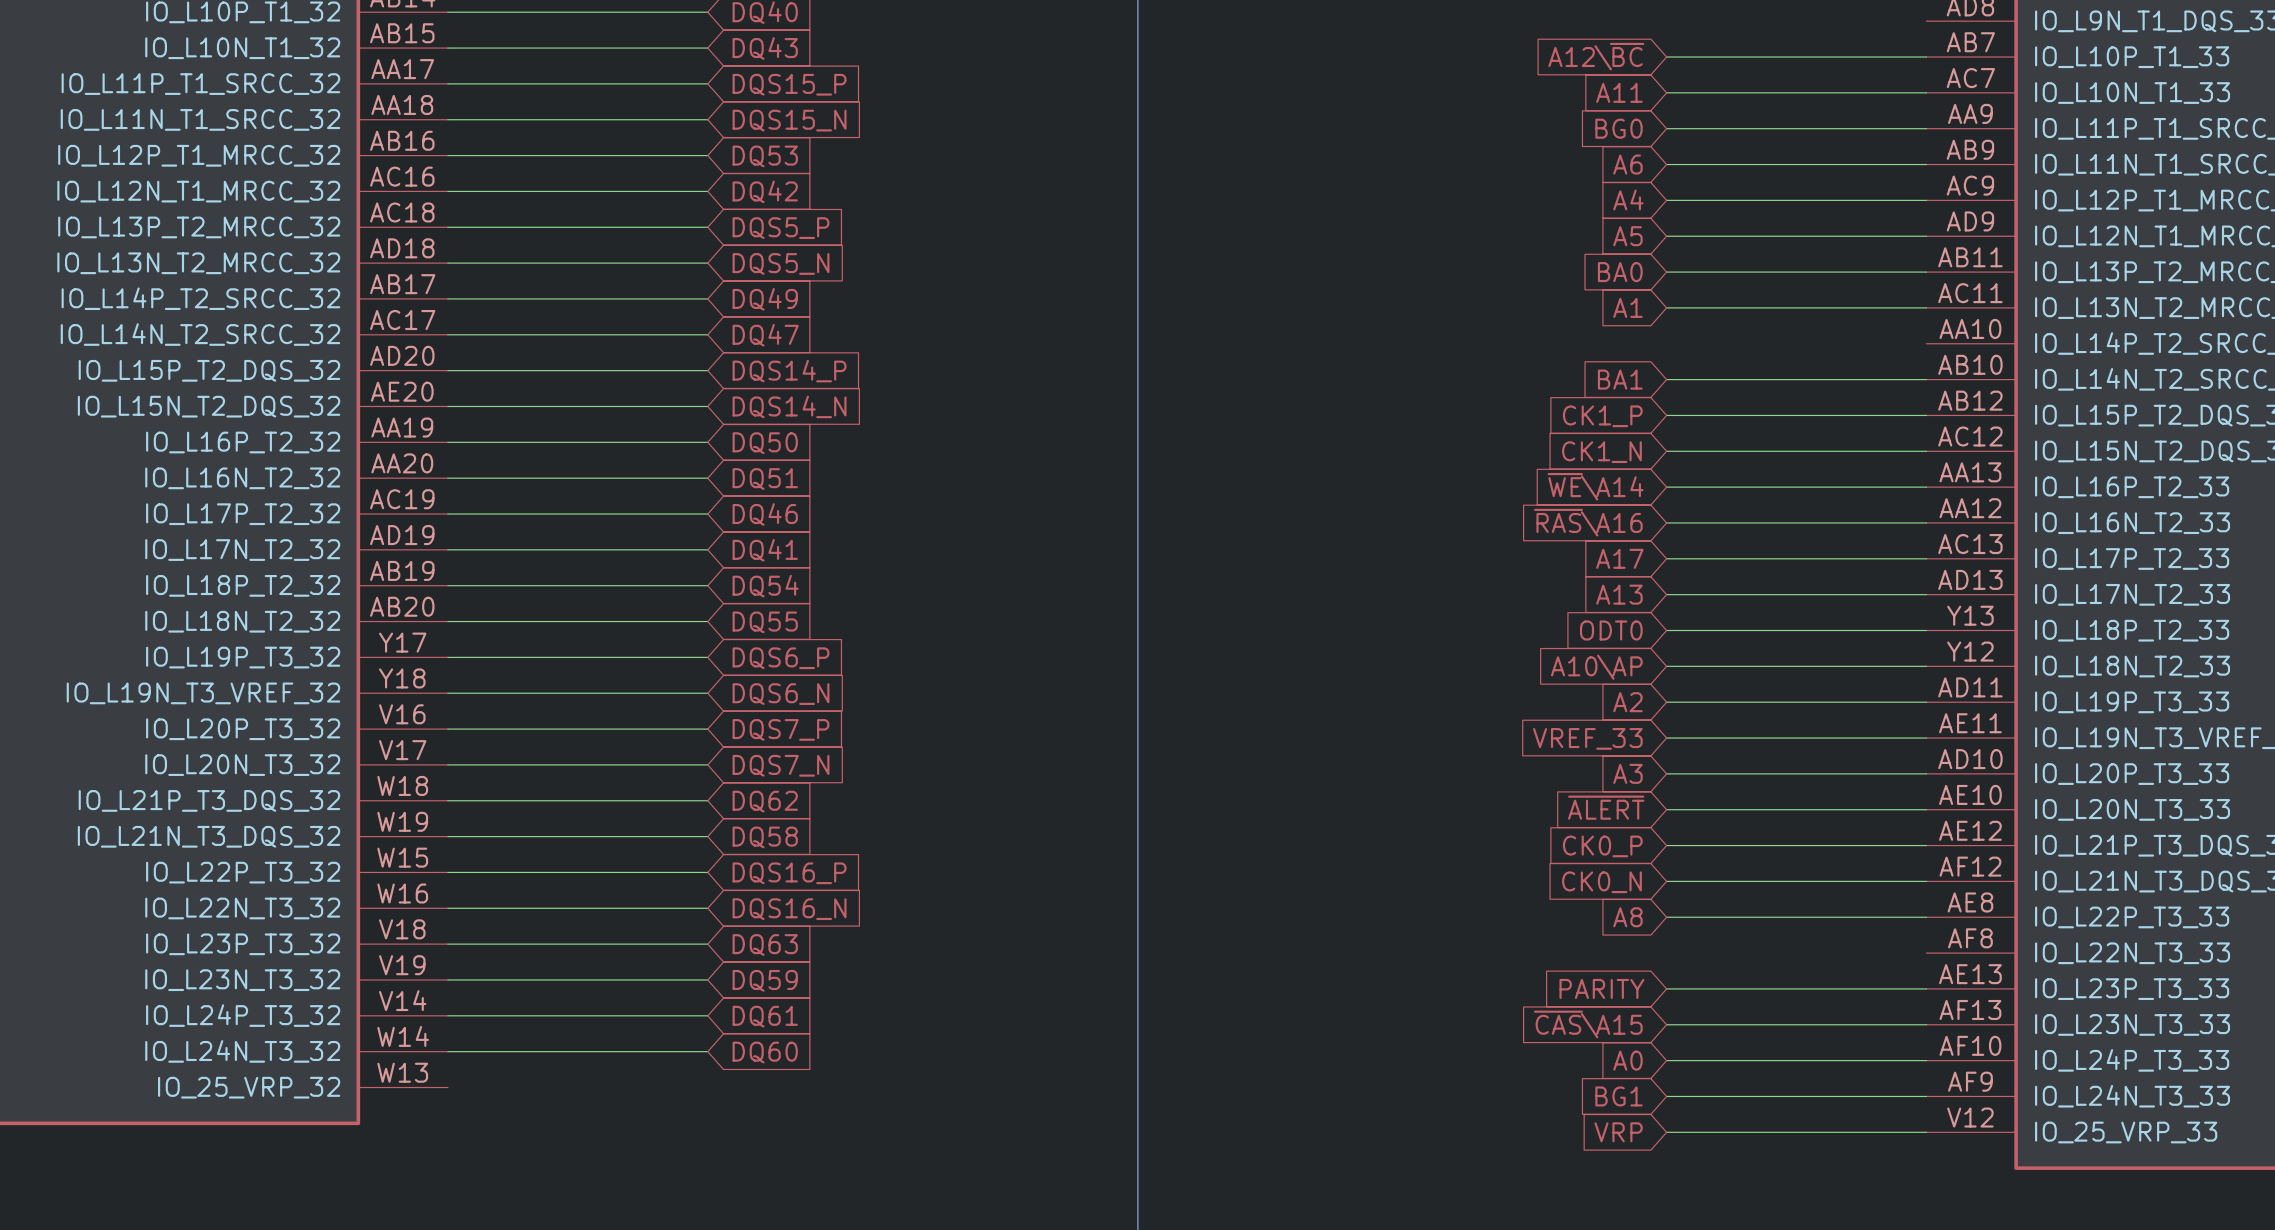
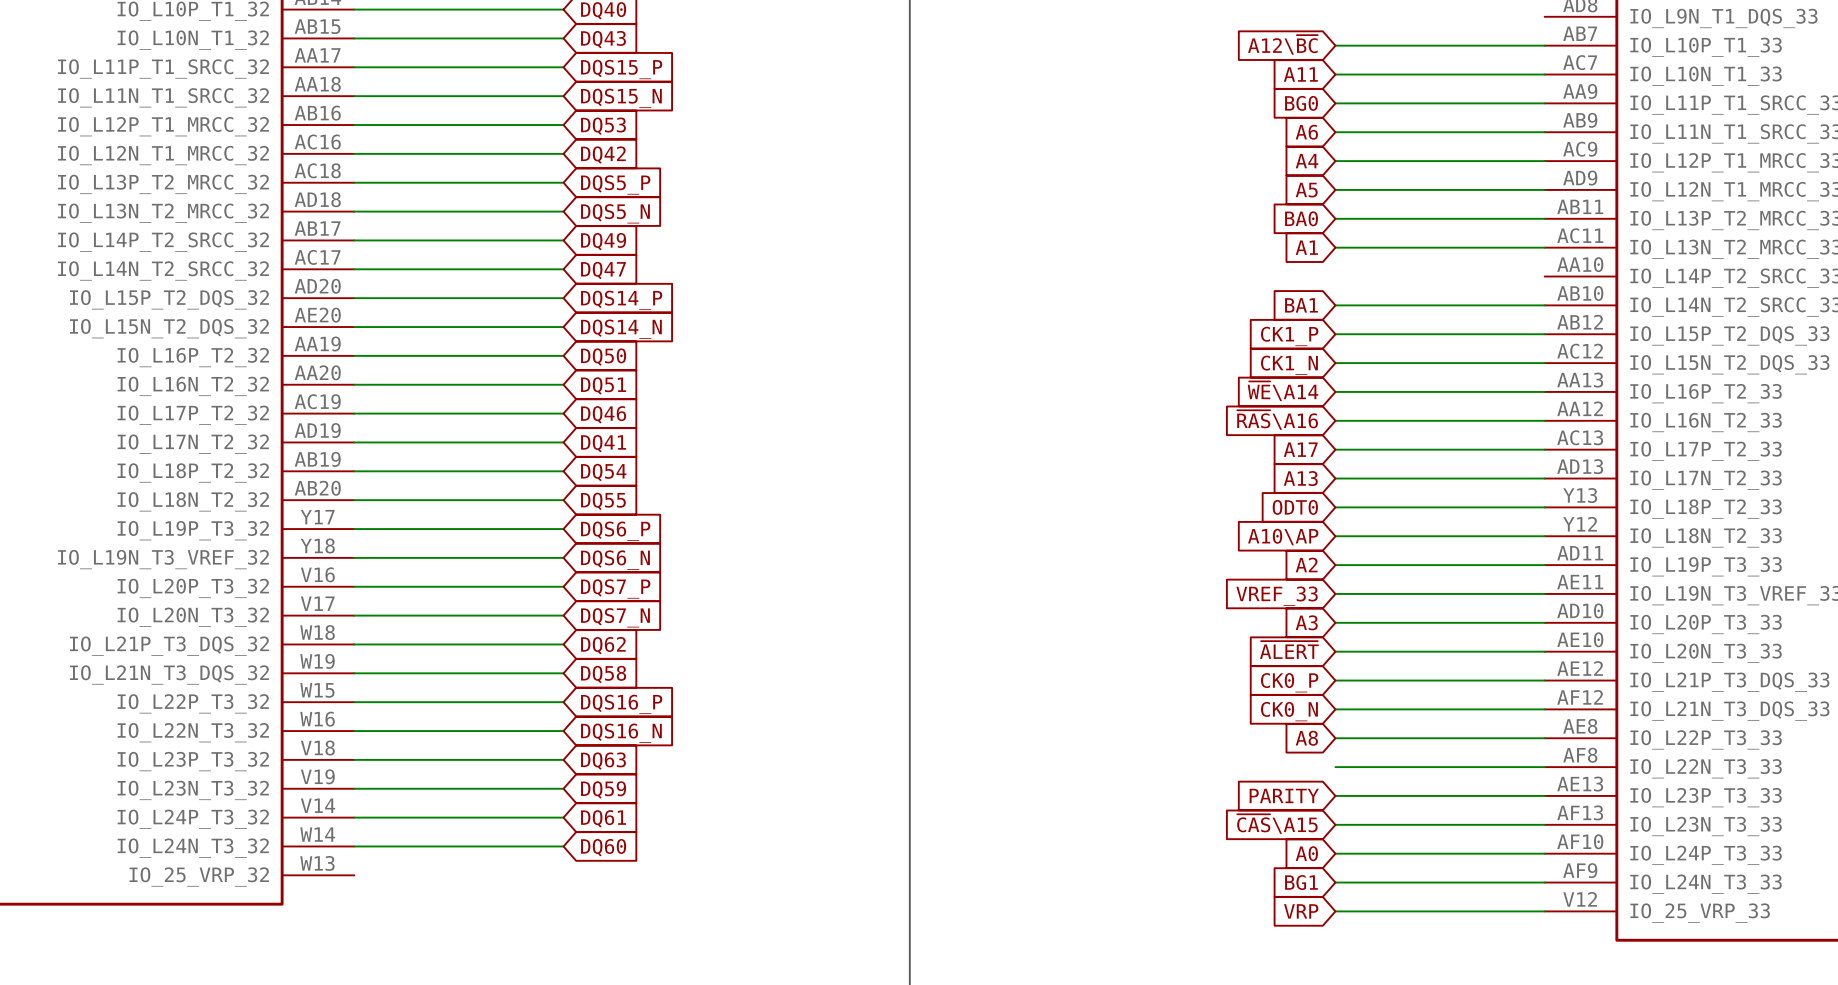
wire: none -> (1335, 767) (1544, 767)

